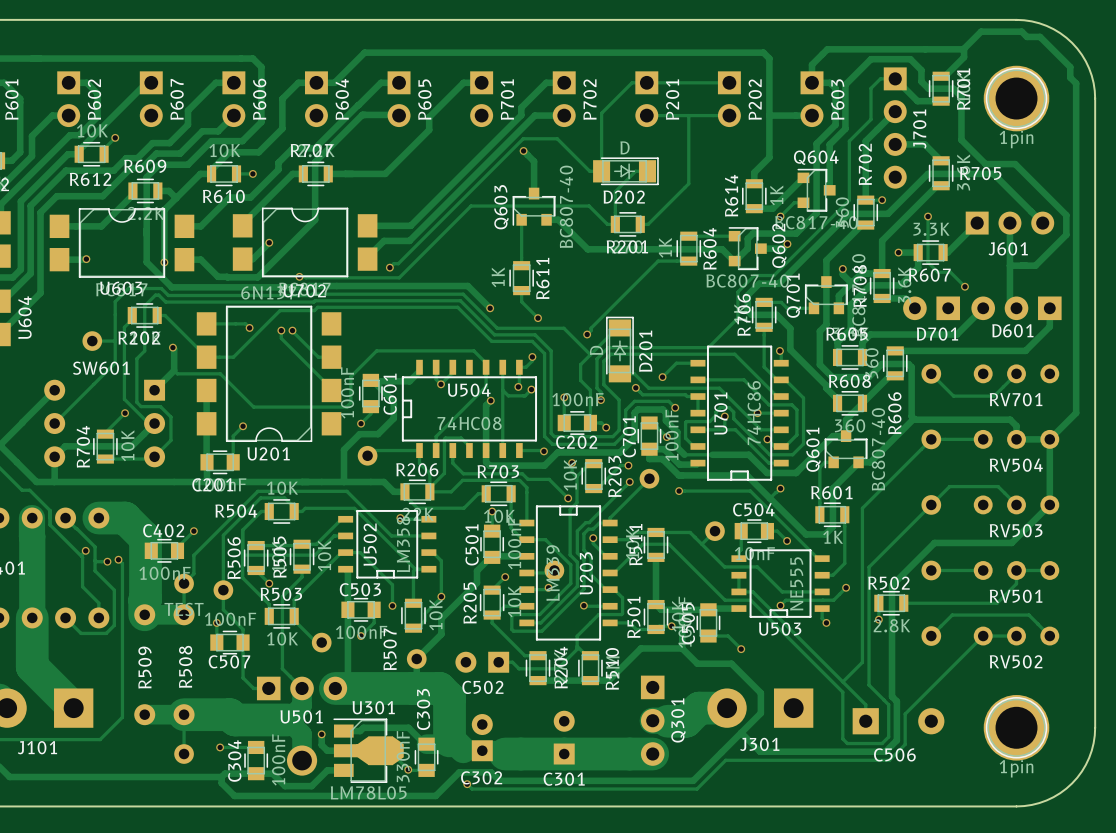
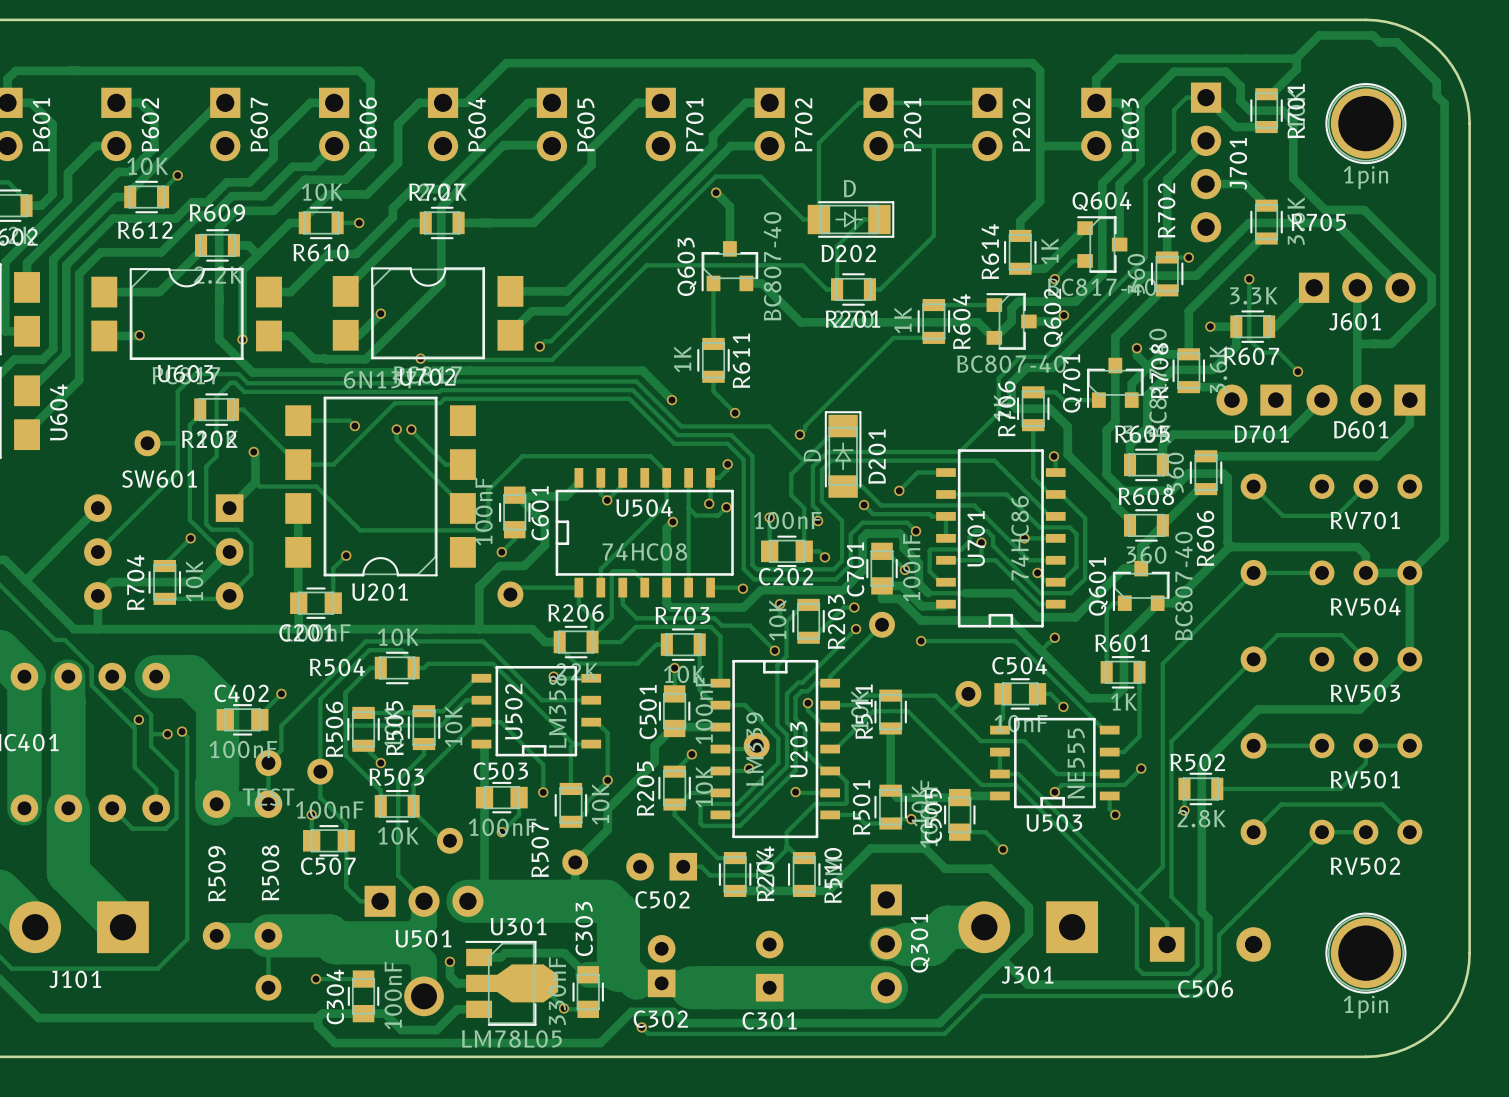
part footprint: [983, 65, 1050, 132] -> [1325, 83, 1407, 165]
part footprint: [983, 695, 1050, 761] -> [1325, 912, 1407, 994]

